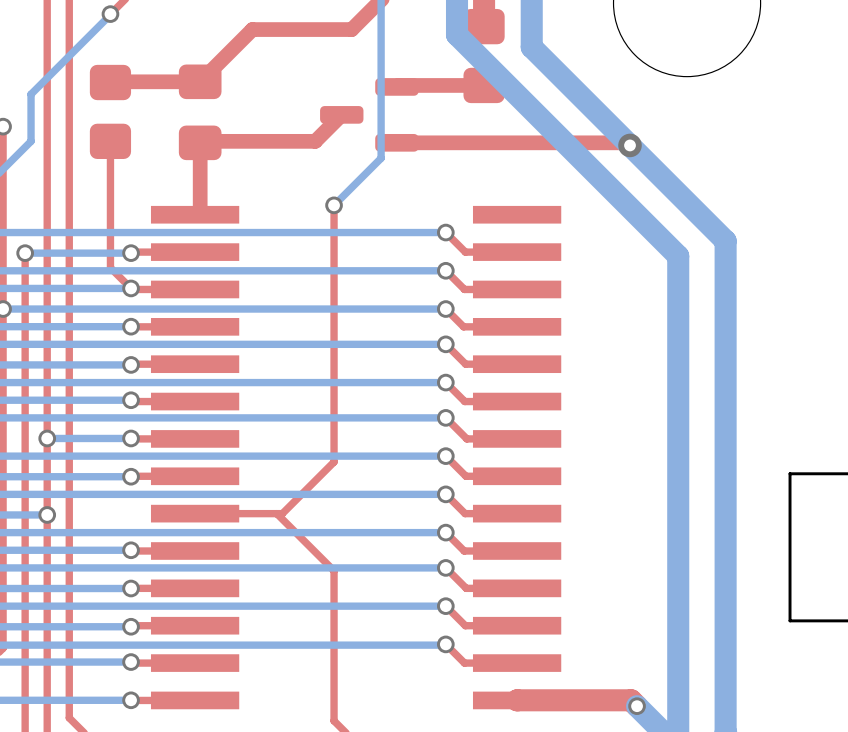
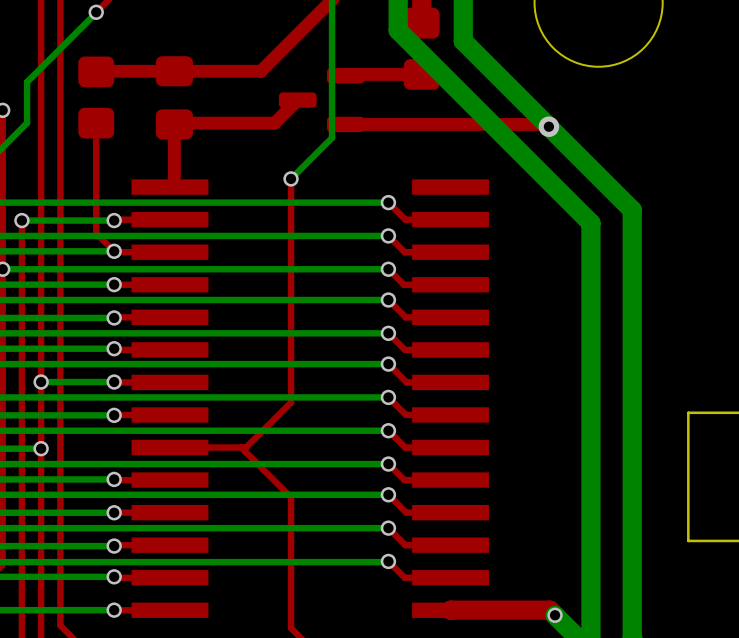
top track: (351, 29) (252, 29) (200, 81) -> (306, 25) (260, 71) (174, 71)

